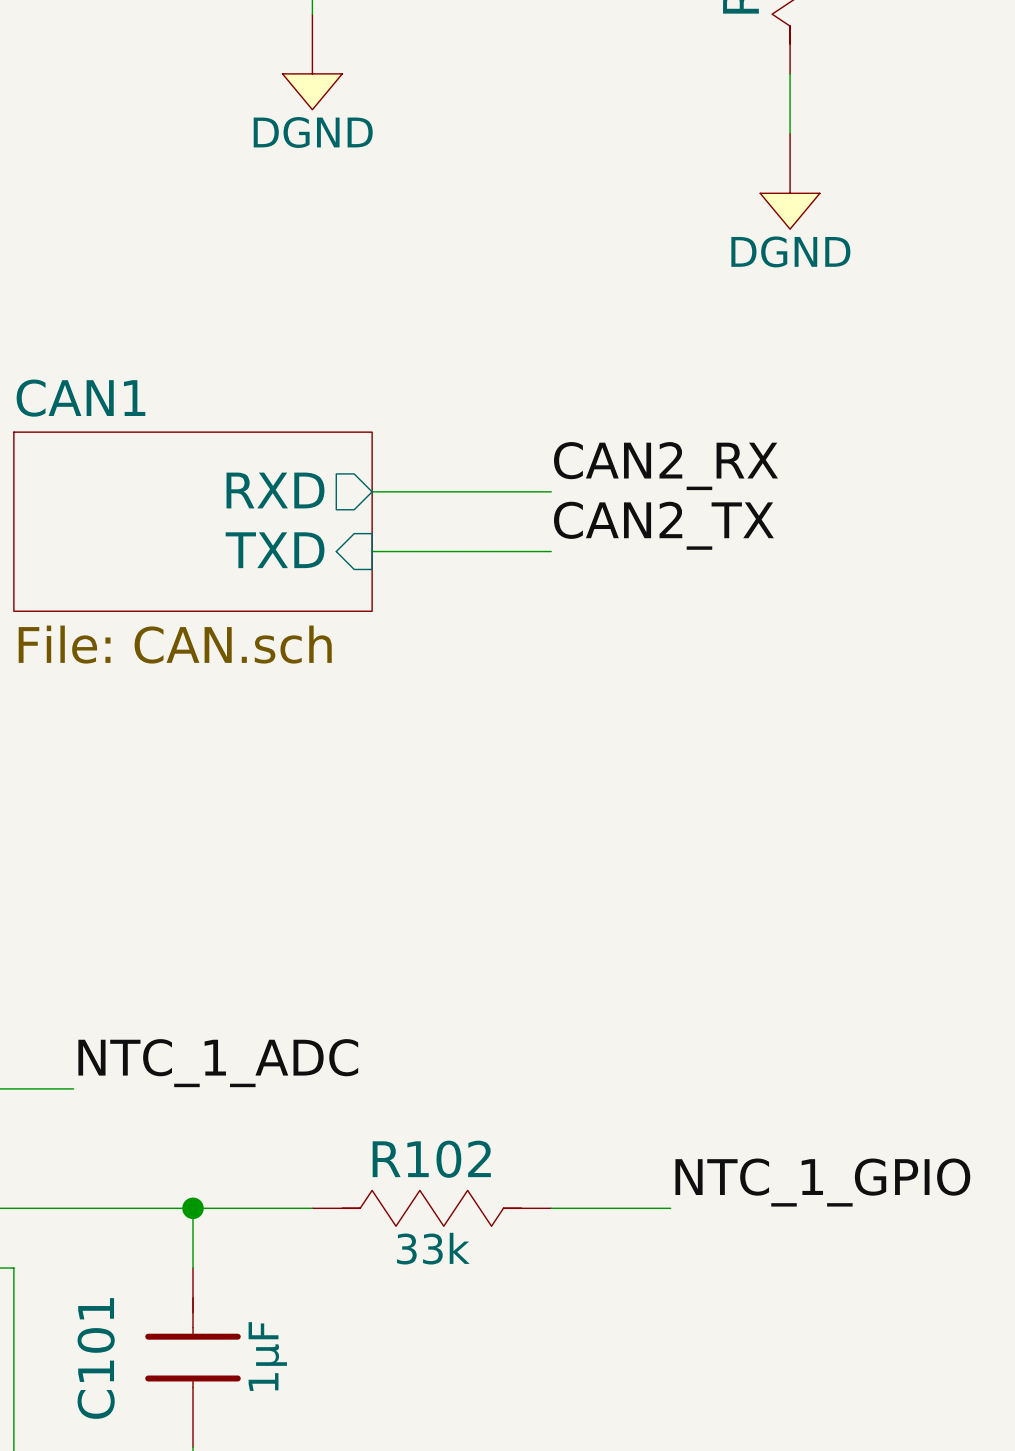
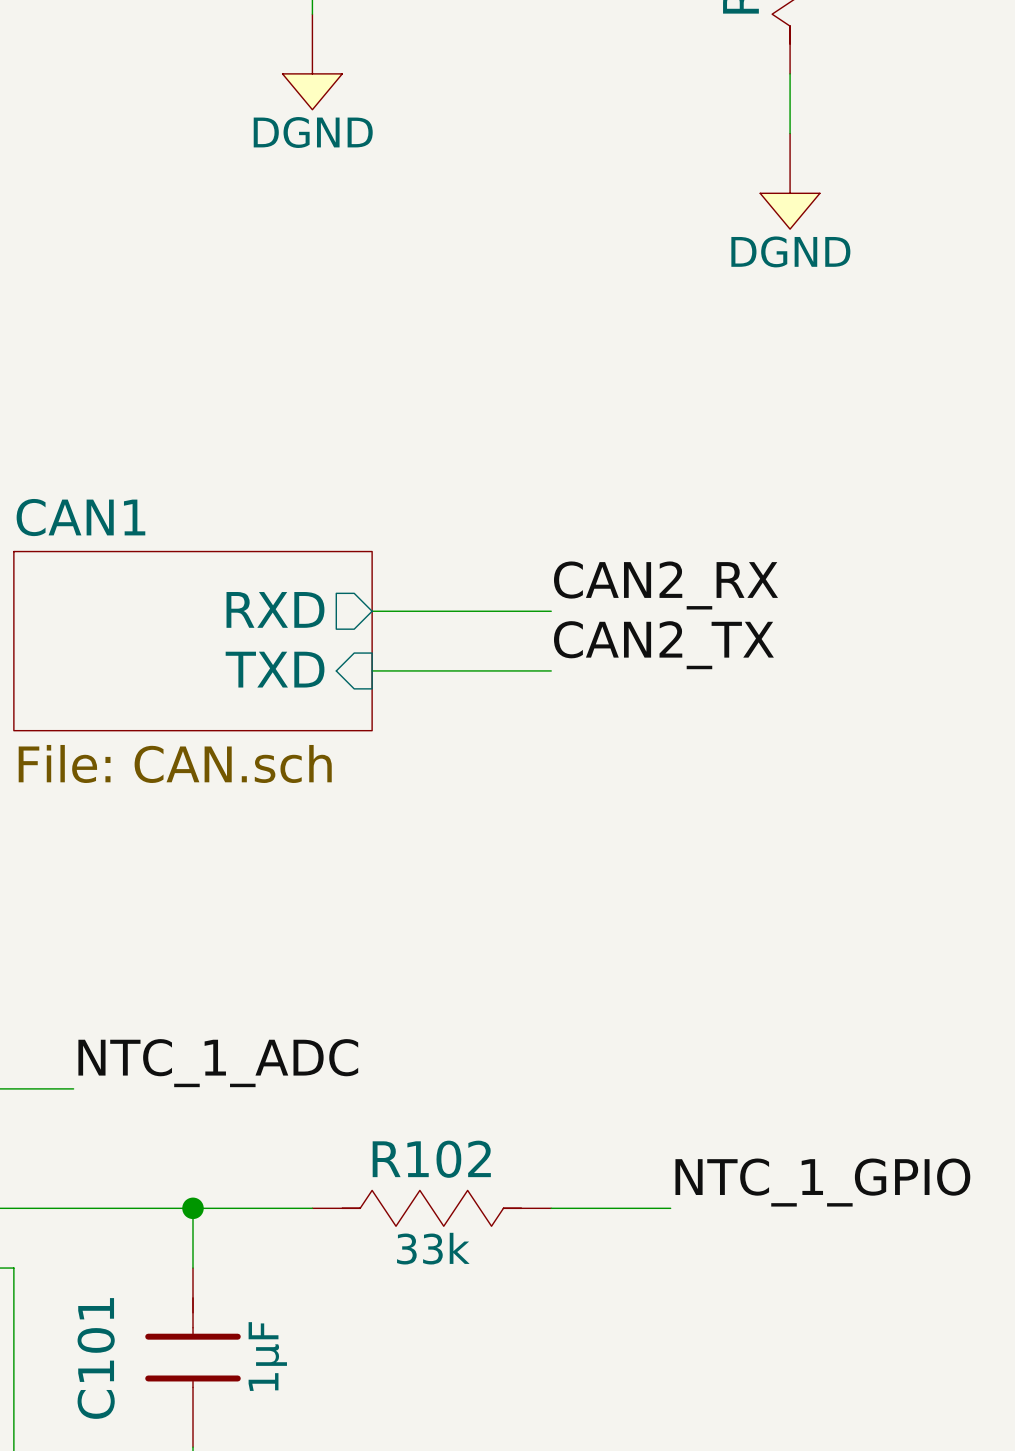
label position: CAN2_RX (666, 466) -> CAN2_RX (666, 585)
sheet pin position: RXD (275, 490) -> RXD (275, 609)
wire: (372, 491) (551, 491) -> (372, 670) (551, 670)
sheet CAN1 position: (193, 521) -> (193, 641)
label position: CAN2_TX (663, 525) -> CAN2_TX (663, 645)
sheet pin position: TXD (275, 550) -> TXD (275, 669)
wire: (372, 551) (551, 551) -> (372, 611) (551, 611)

